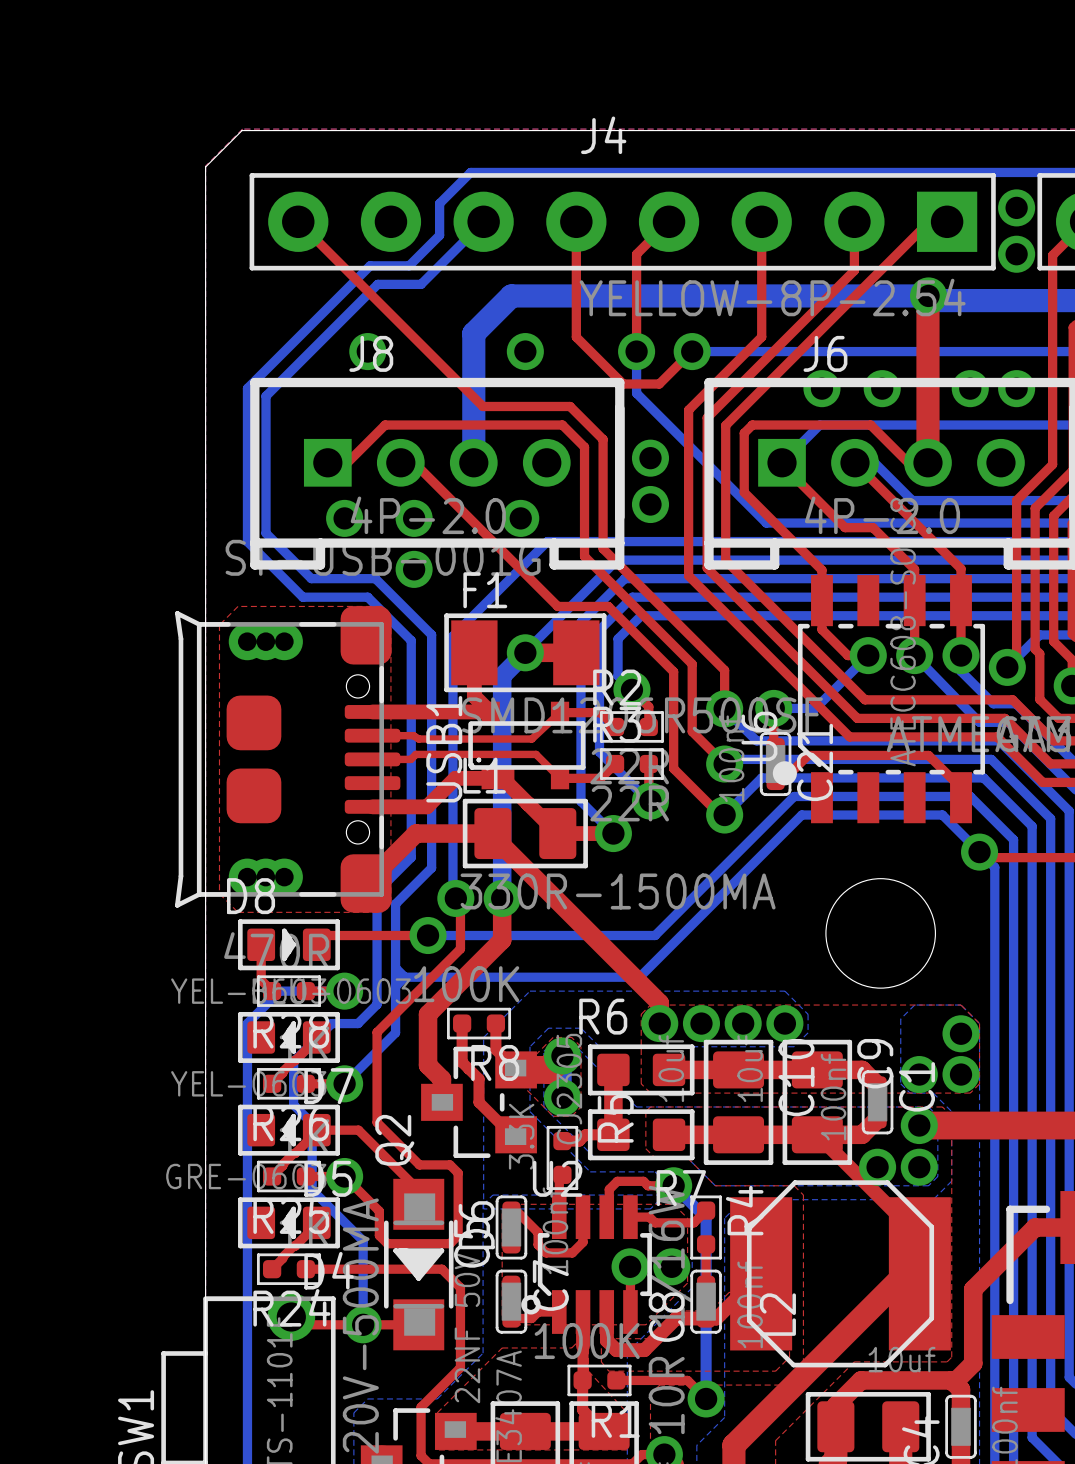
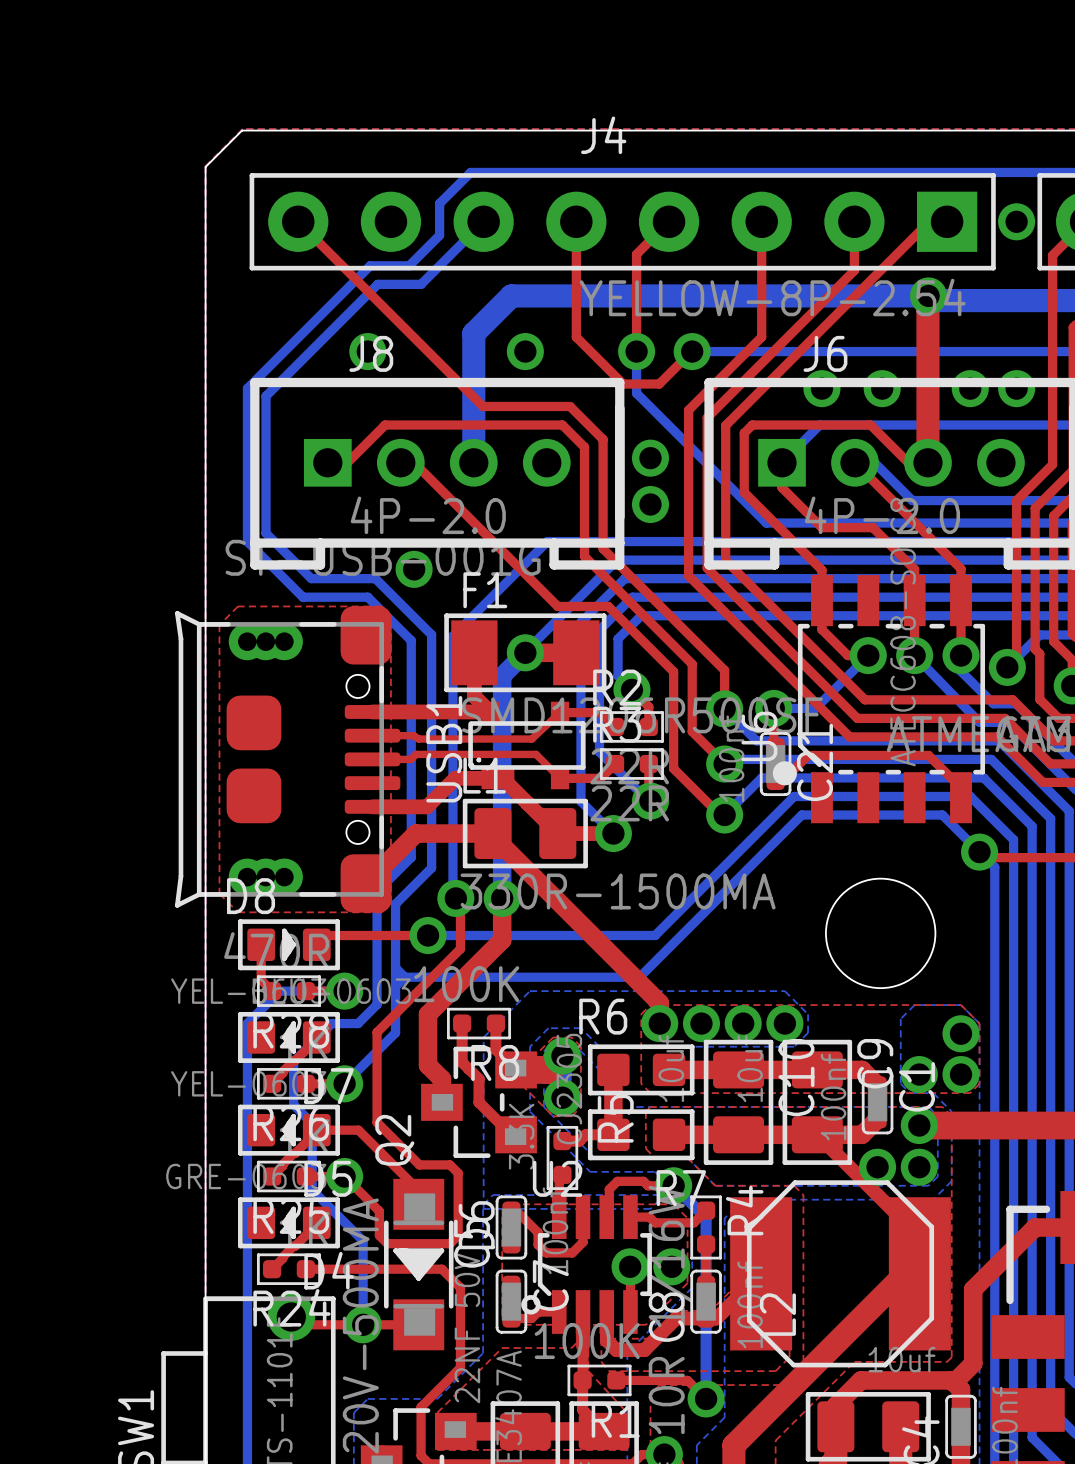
via position: (1016, 207) -> (1016, 221)
via: (1016, 254) -> none
top track: (782, 464) (845, 527) -> (782, 464) (782, 487) (821, 527) (845, 527)
via: (344, 518) -> none
via: (414, 518) -> none
via: (520, 518) -> none

